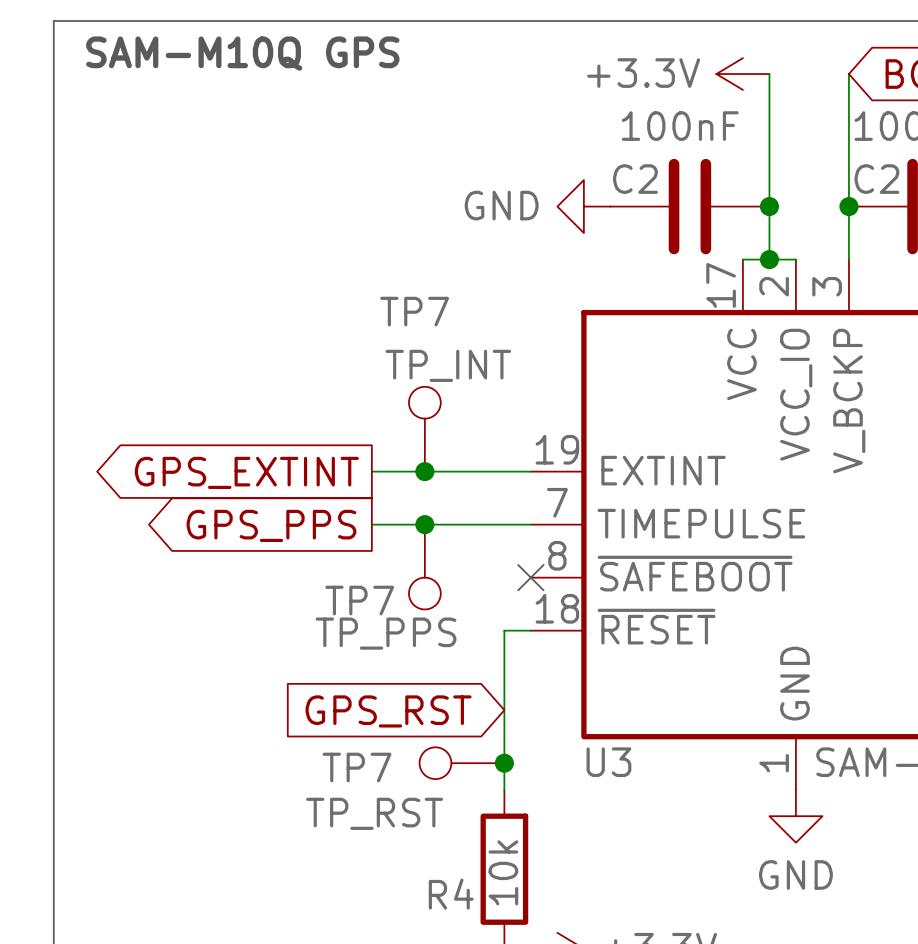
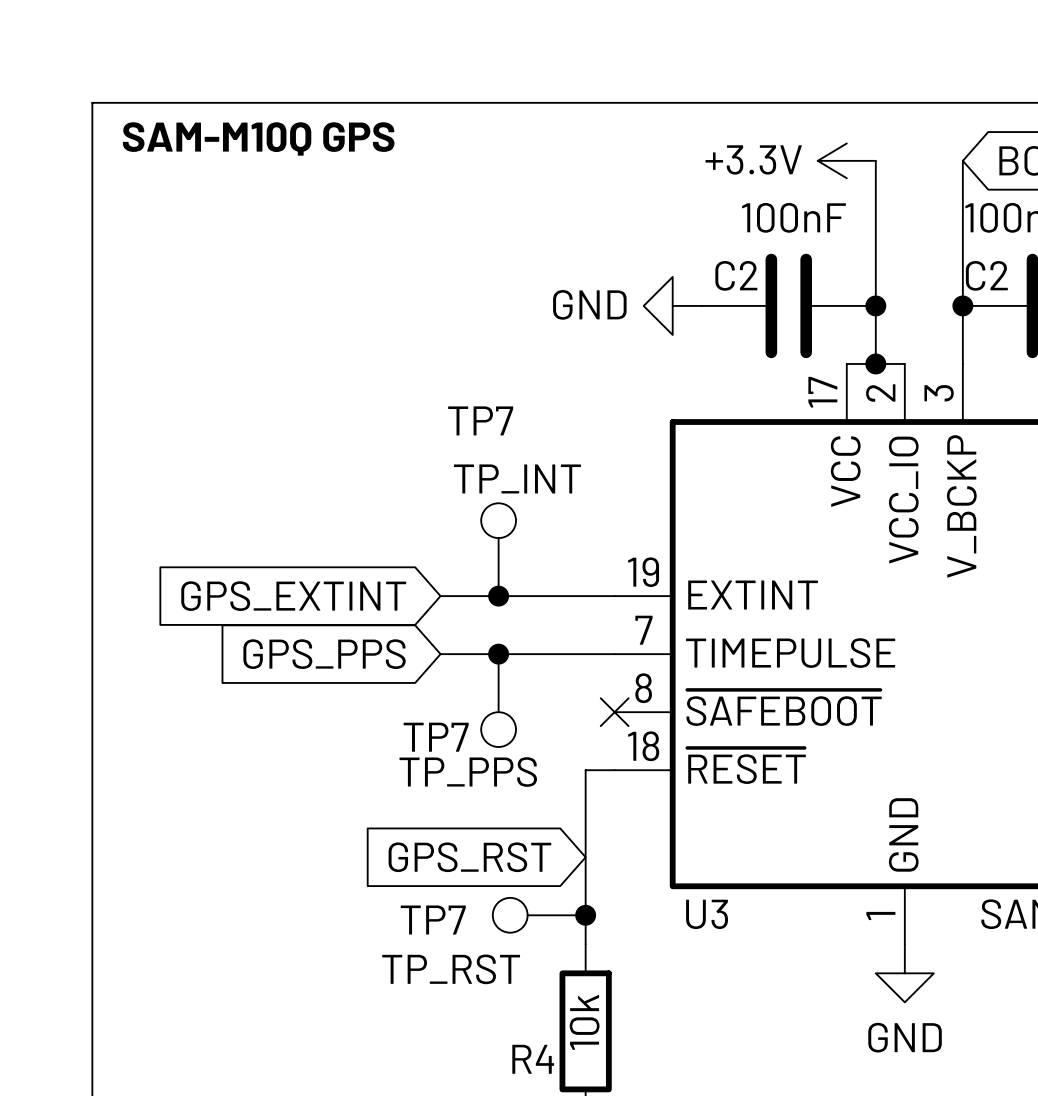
global label shape: output (246, 472) -> input (293, 596)
global label shape: output (271, 525) -> input (324, 654)

